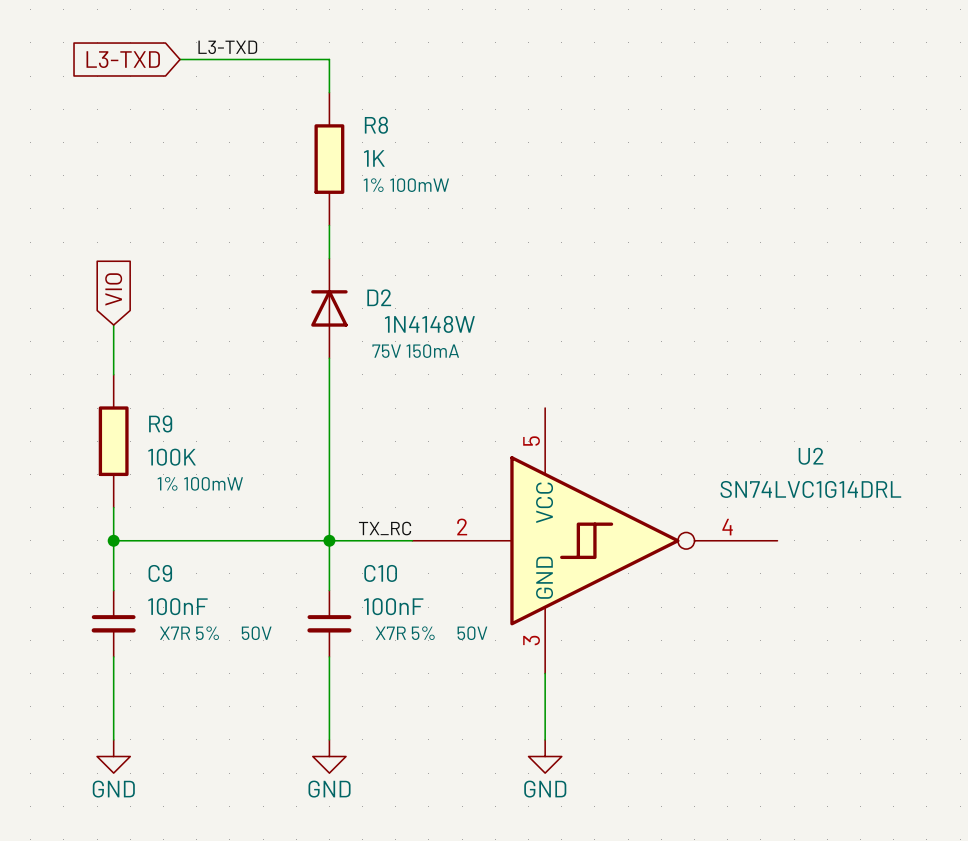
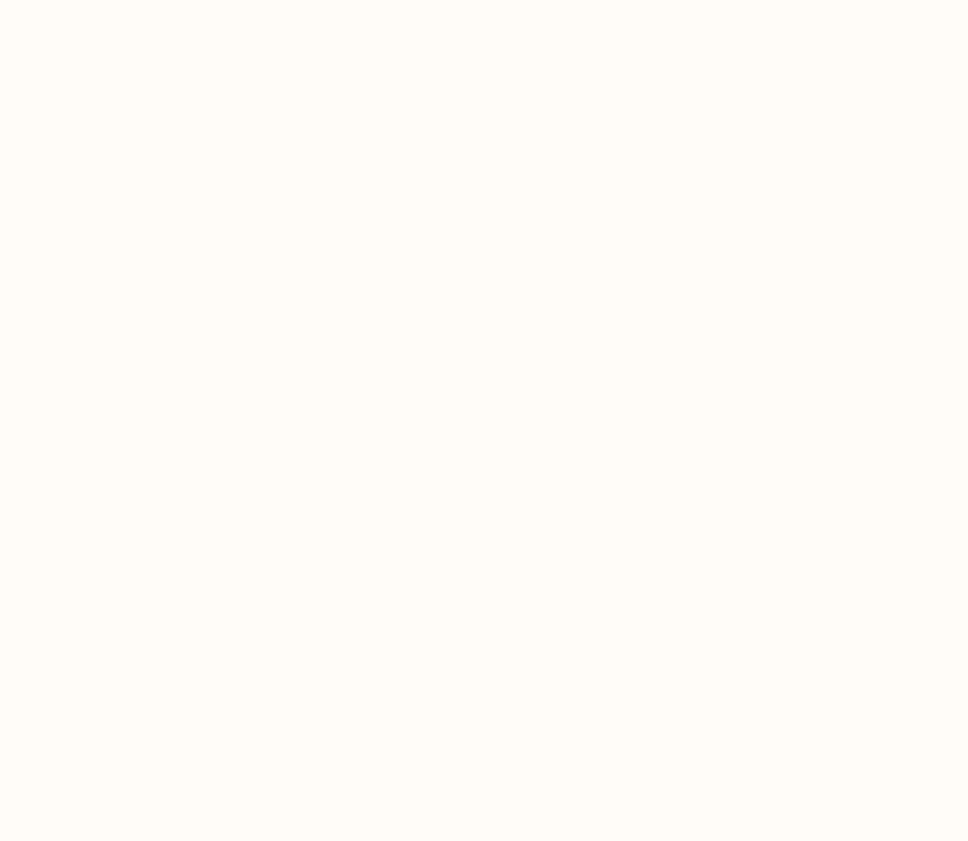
label: L3-TXD (227, 47) -> none
global label: L3-TXD (123, 59) -> none
wire: (180, 59) (329, 59) (329, 92) -> none
R8: 1K (329, 159) -> none
wire: (329, 225) (329, 258) -> none
global label: VIO (113, 289) -> none
D2: 1N4148W (329, 308) -> none
wire: (113, 325) (113, 374) -> none
wire: (329, 358) (329, 590) -> none
R9: 100K (113, 441) -> none
wire: (113, 507) (113, 590) -> none
label: TX_RC (385, 528) -> none
wire: (113, 540) (412, 540) -> none
junction: (113, 540) -> none
junction: (329, 540) -> none
U2: SN74LVC1G14DRL (594, 540) -> none
C9: 100nF (113, 623) -> none
C10: 100nF (329, 623) -> none
wire: (113, 656) (113, 739) -> none
wire: (329, 656) (329, 739) -> none
wire: (545, 673) (545, 739) -> none
power symbol: GND (113, 756) -> none
power symbol: GND (329, 756) -> none
power symbol: GND (545, 756) -> none

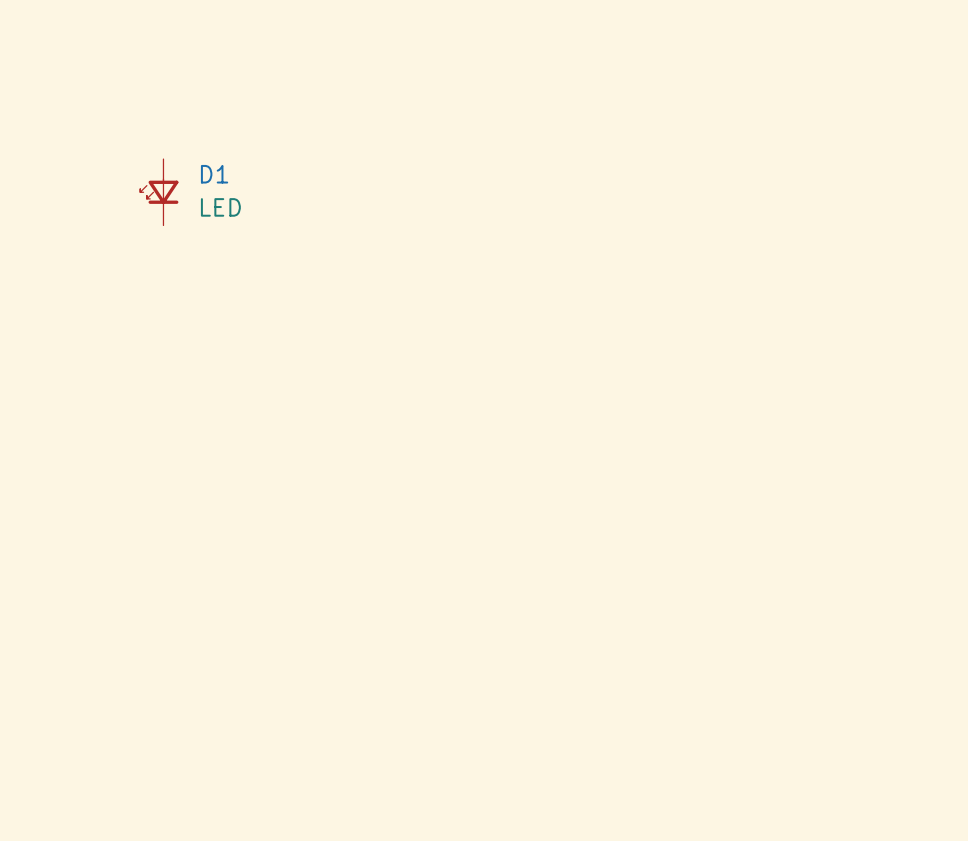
D1: none -> LED (159, 192)

